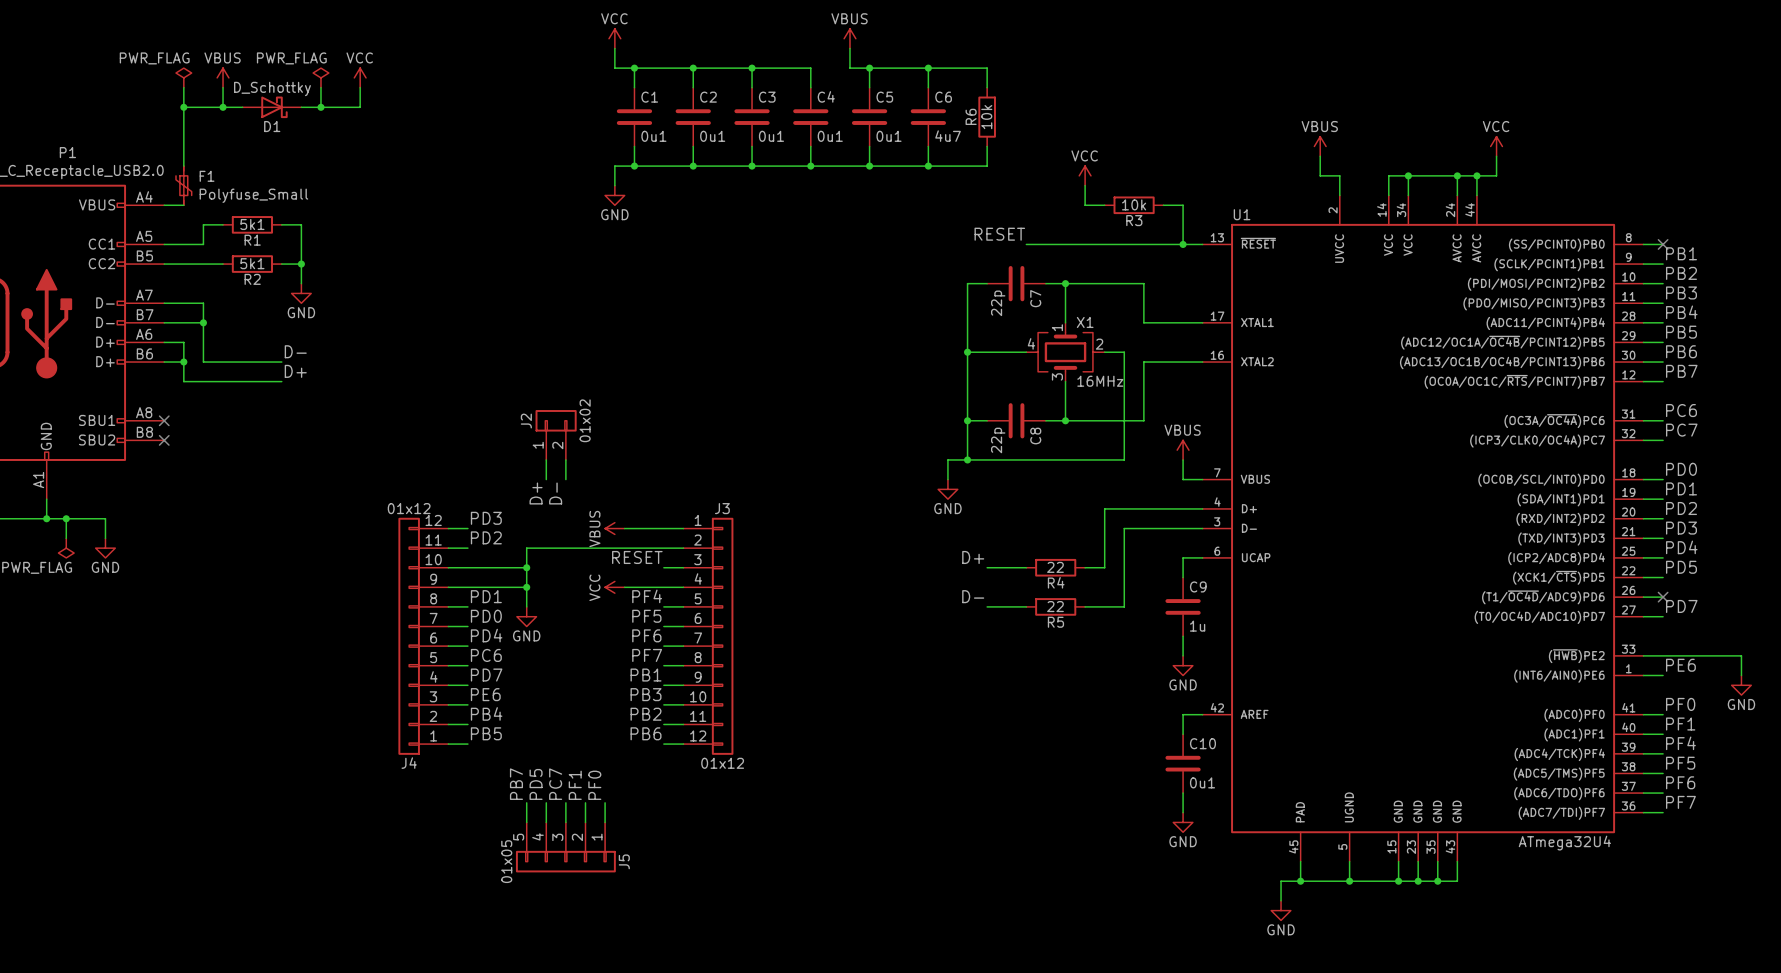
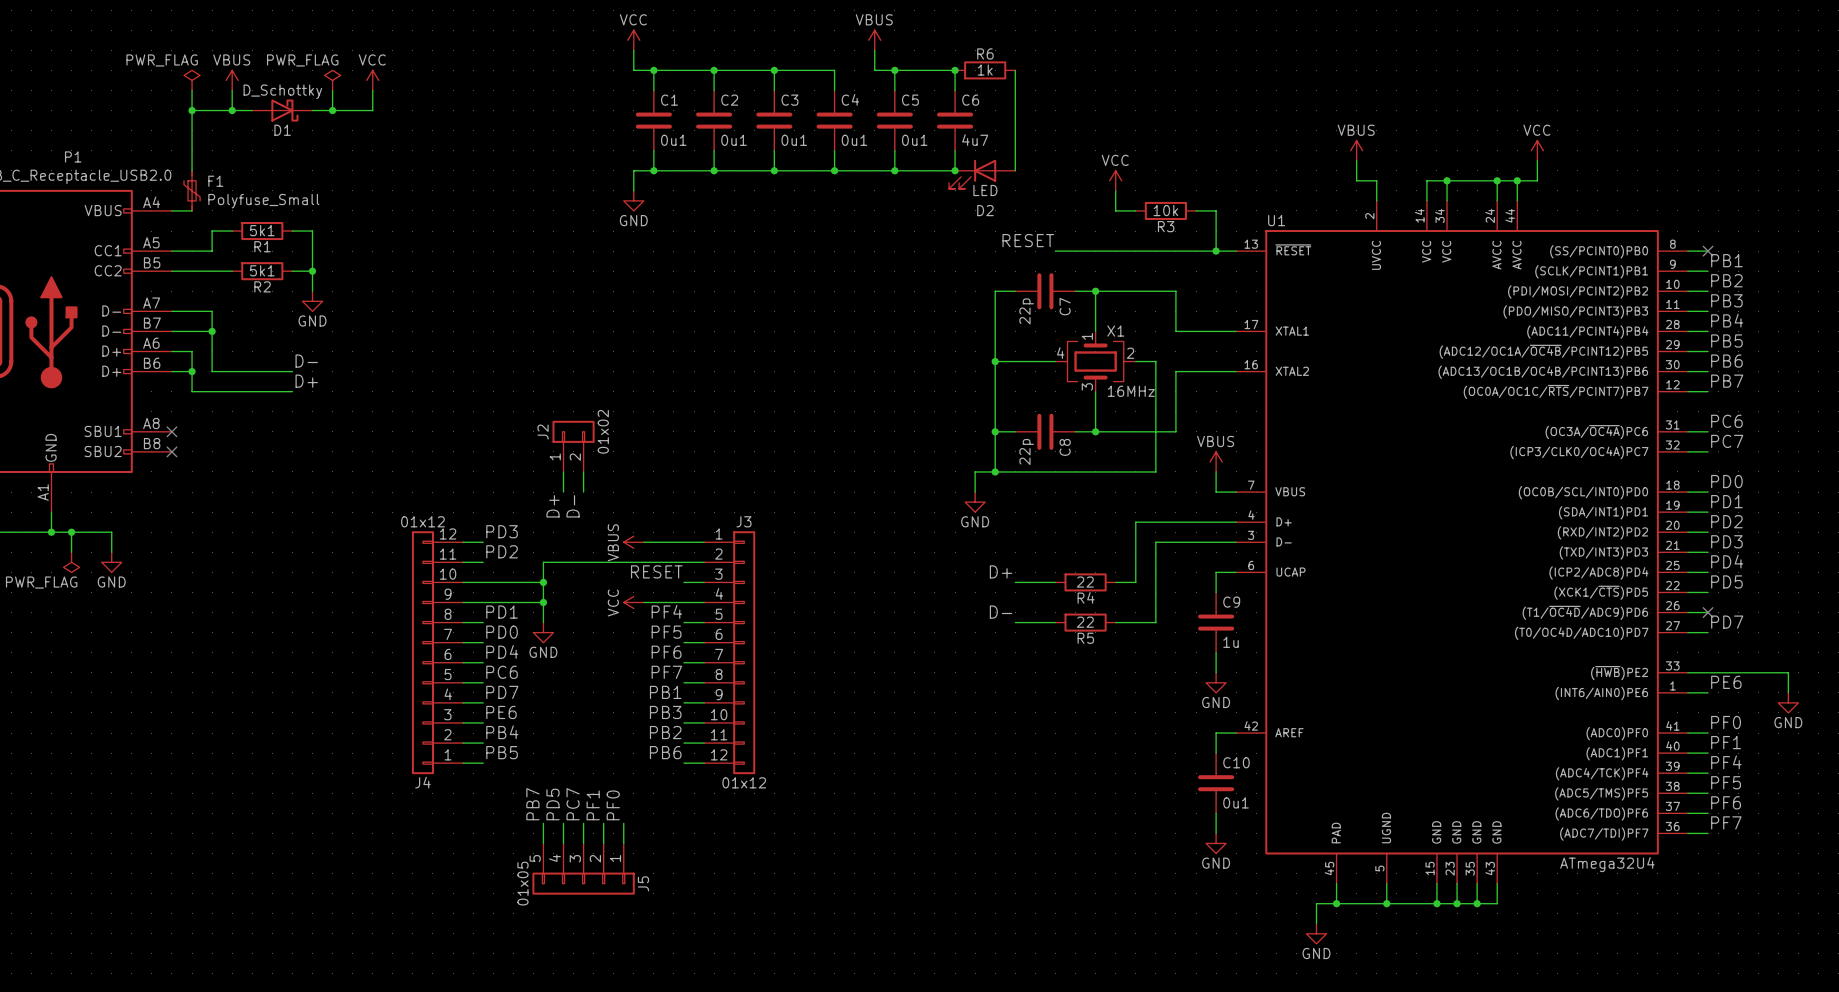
wire: (928, 68) (987, 68) -> none
wire: none -> (1015, 90) (1015, 150)
R6 value: 10k (986, 117) -> 1k (985, 70)
R6 rotation: 0° (987, 117) -> 90° clockwise (985, 70)
R6 position: (987, 117) -> (985, 70)
D2: none -> LED (982, 174)

